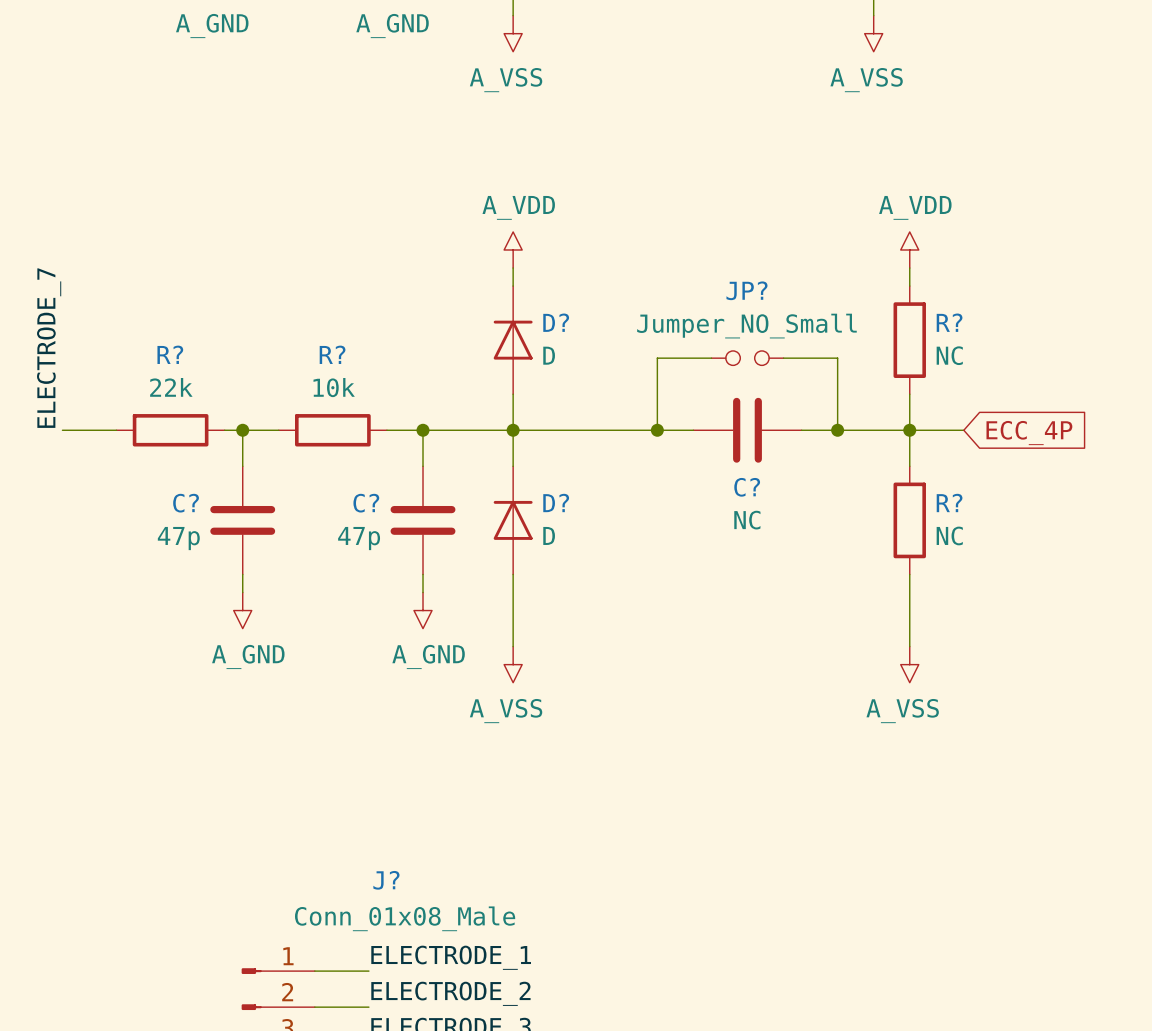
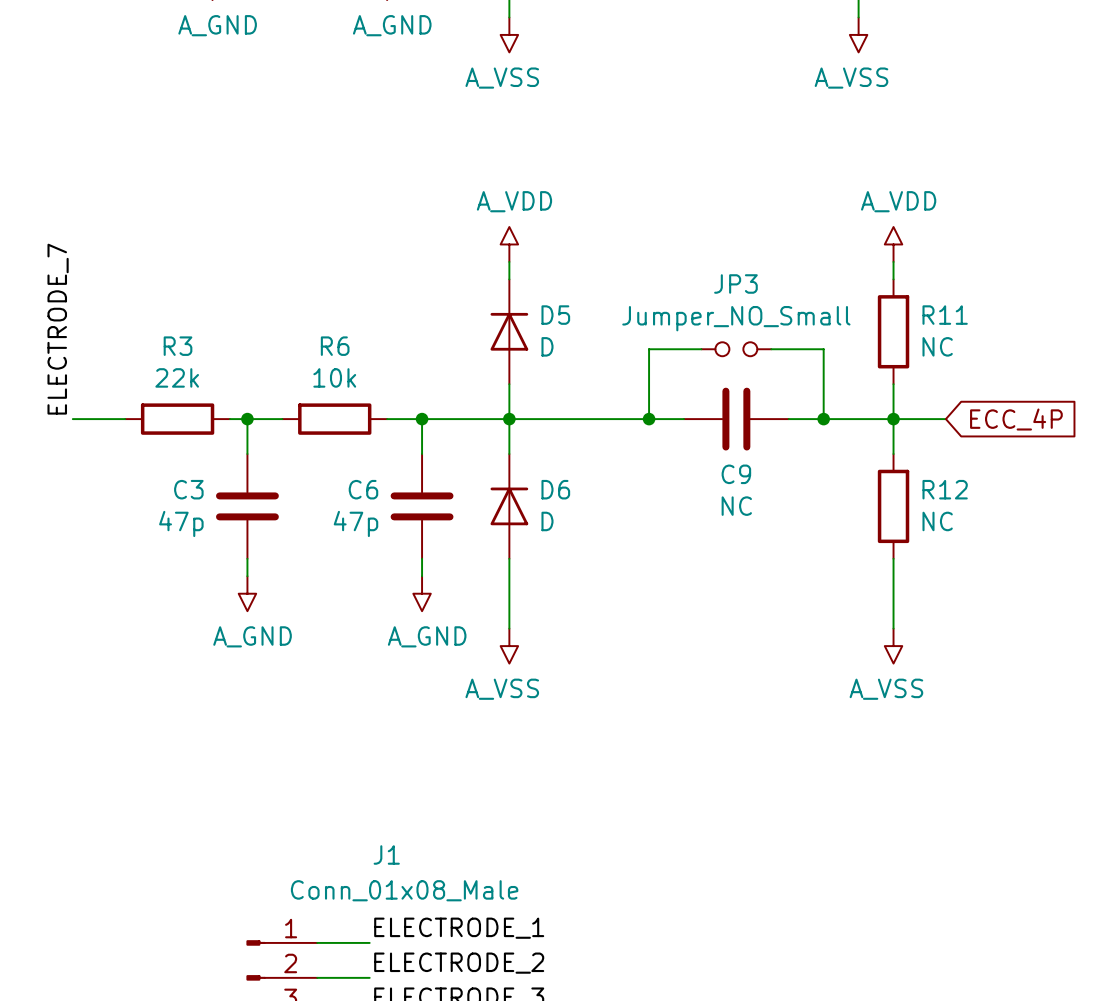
JP? name: JP? (746, 290) -> JP3 (735, 283)
D? name: D? (556, 322) -> D5 (555, 315)
R? name: R? (949, 322) -> R11 (945, 315)
R? name: R? (170, 354) -> R3 (178, 346)
R? name: R? (332, 354) -> R6 (335, 346)
C? name: C? (747, 487) -> C9 (736, 474)
D? name: D? (556, 502) -> D6 (555, 489)
R? name: R? (949, 502) -> R12 (945, 489)
C? name: C? (186, 503) -> C3 (188, 489)
C? name: C? (366, 503) -> C6 (363, 489)
J? name: J? (386, 880) -> J1 (386, 854)

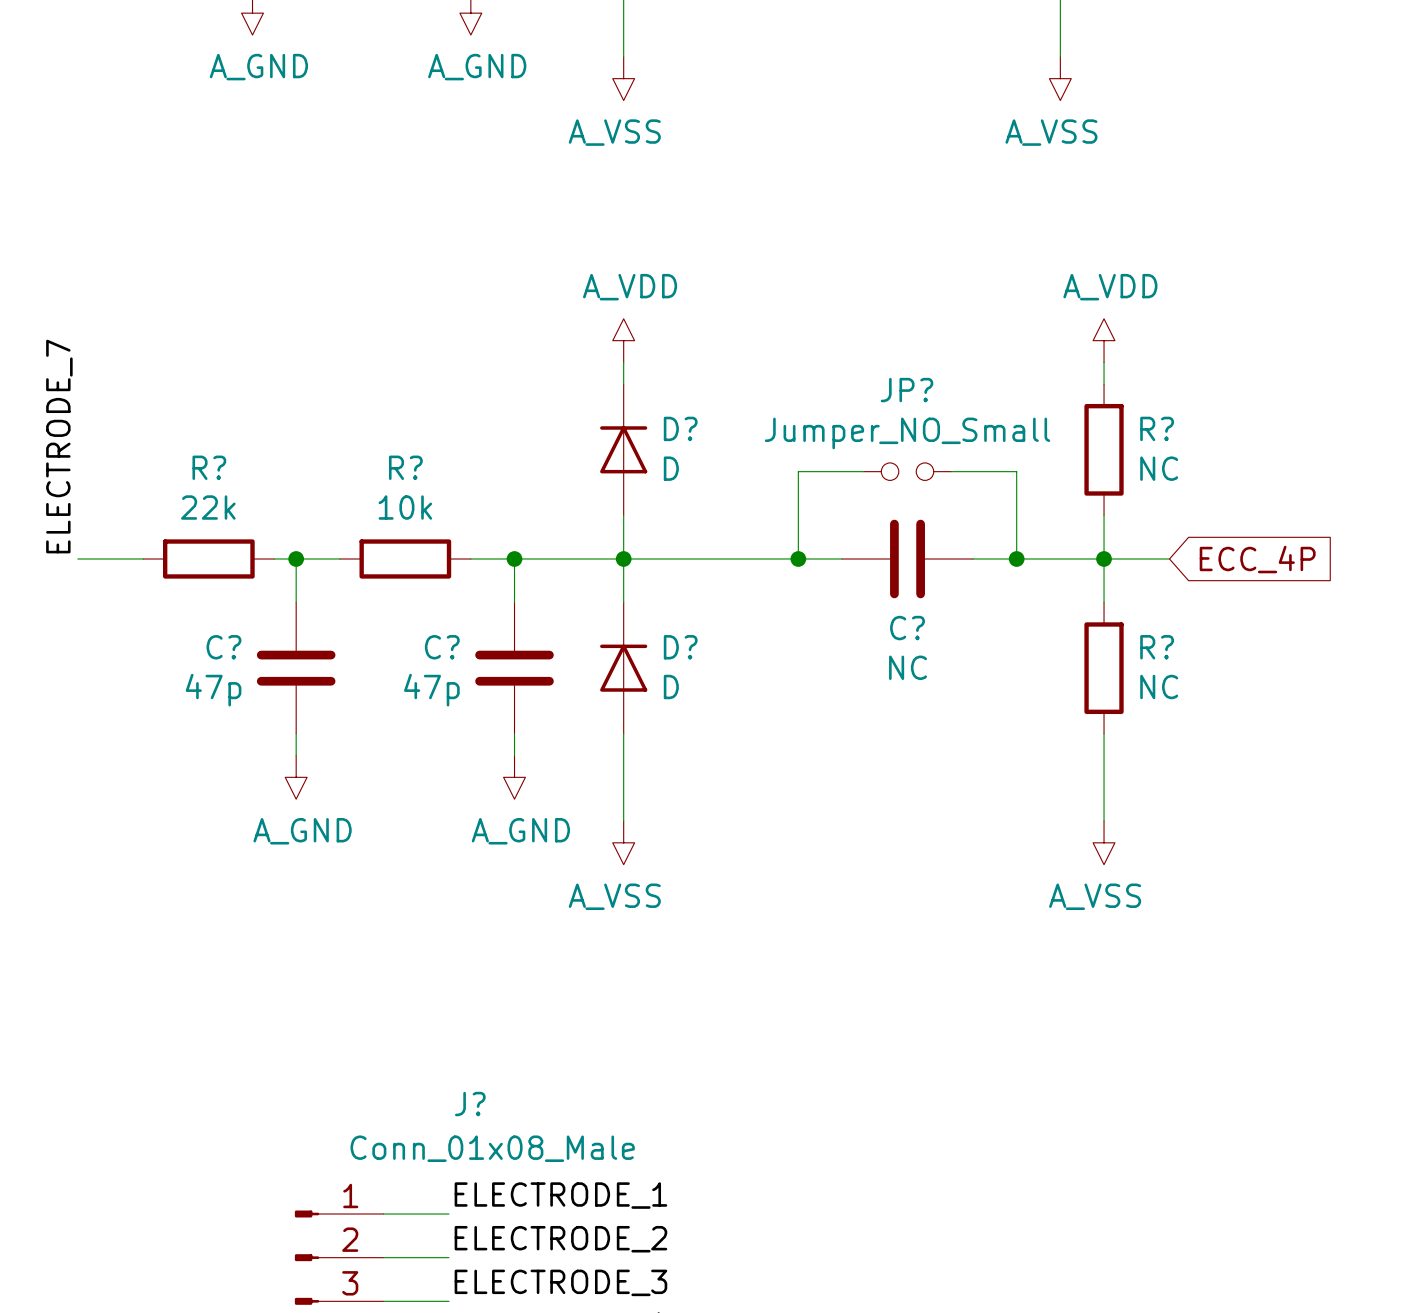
JP3 name: JP3 (735, 283) -> JP? (906, 390)
D5 name: D5 (555, 315) -> D? (680, 428)
R11 name: R11 (945, 315) -> R? (1157, 428)
R3 name: R3 (178, 346) -> R? (209, 467)
R6 name: R6 (335, 346) -> R? (405, 467)
C9 name: C9 (736, 474) -> C? (907, 628)
C3 name: C3 (188, 489) -> C? (223, 647)
C6 name: C6 (363, 489) -> C? (442, 647)
D6 name: D6 (555, 489) -> D? (680, 647)
R12 name: R12 (945, 489) -> R? (1157, 647)
J1 name: J1 (386, 854) -> J? (470, 1104)

